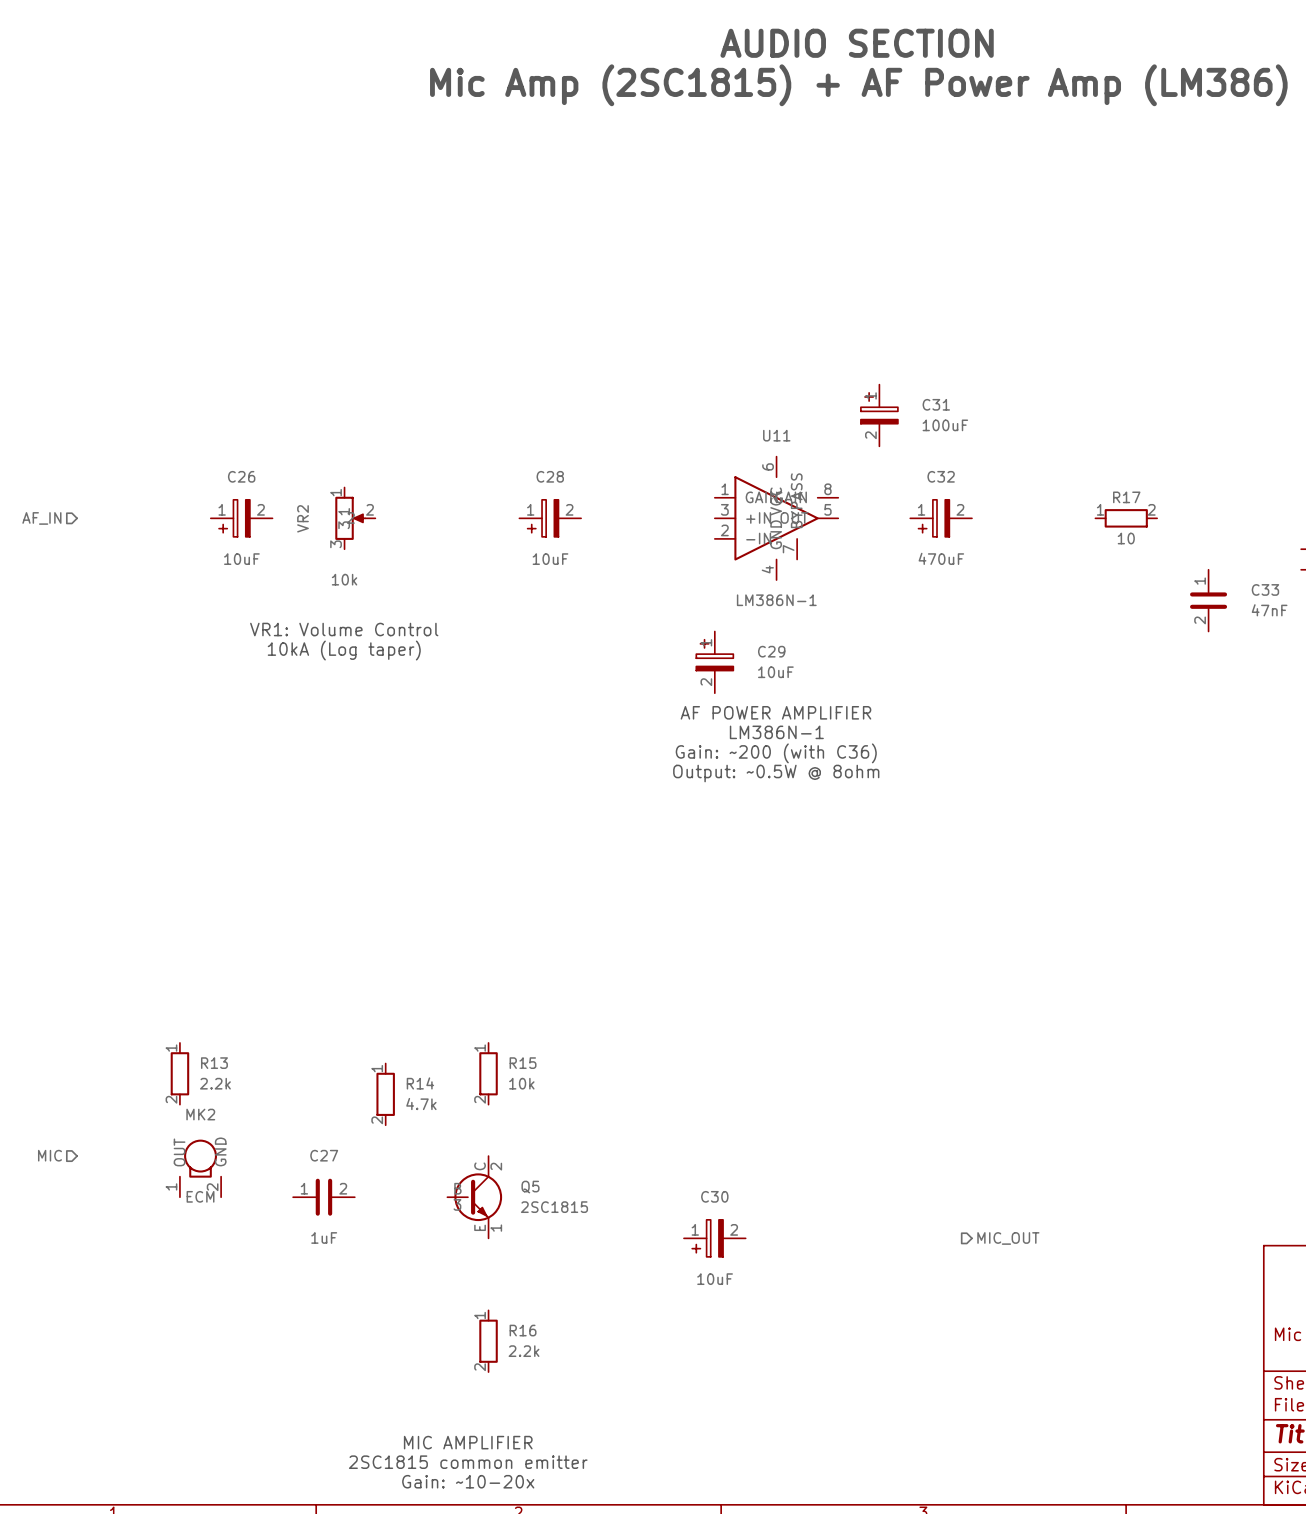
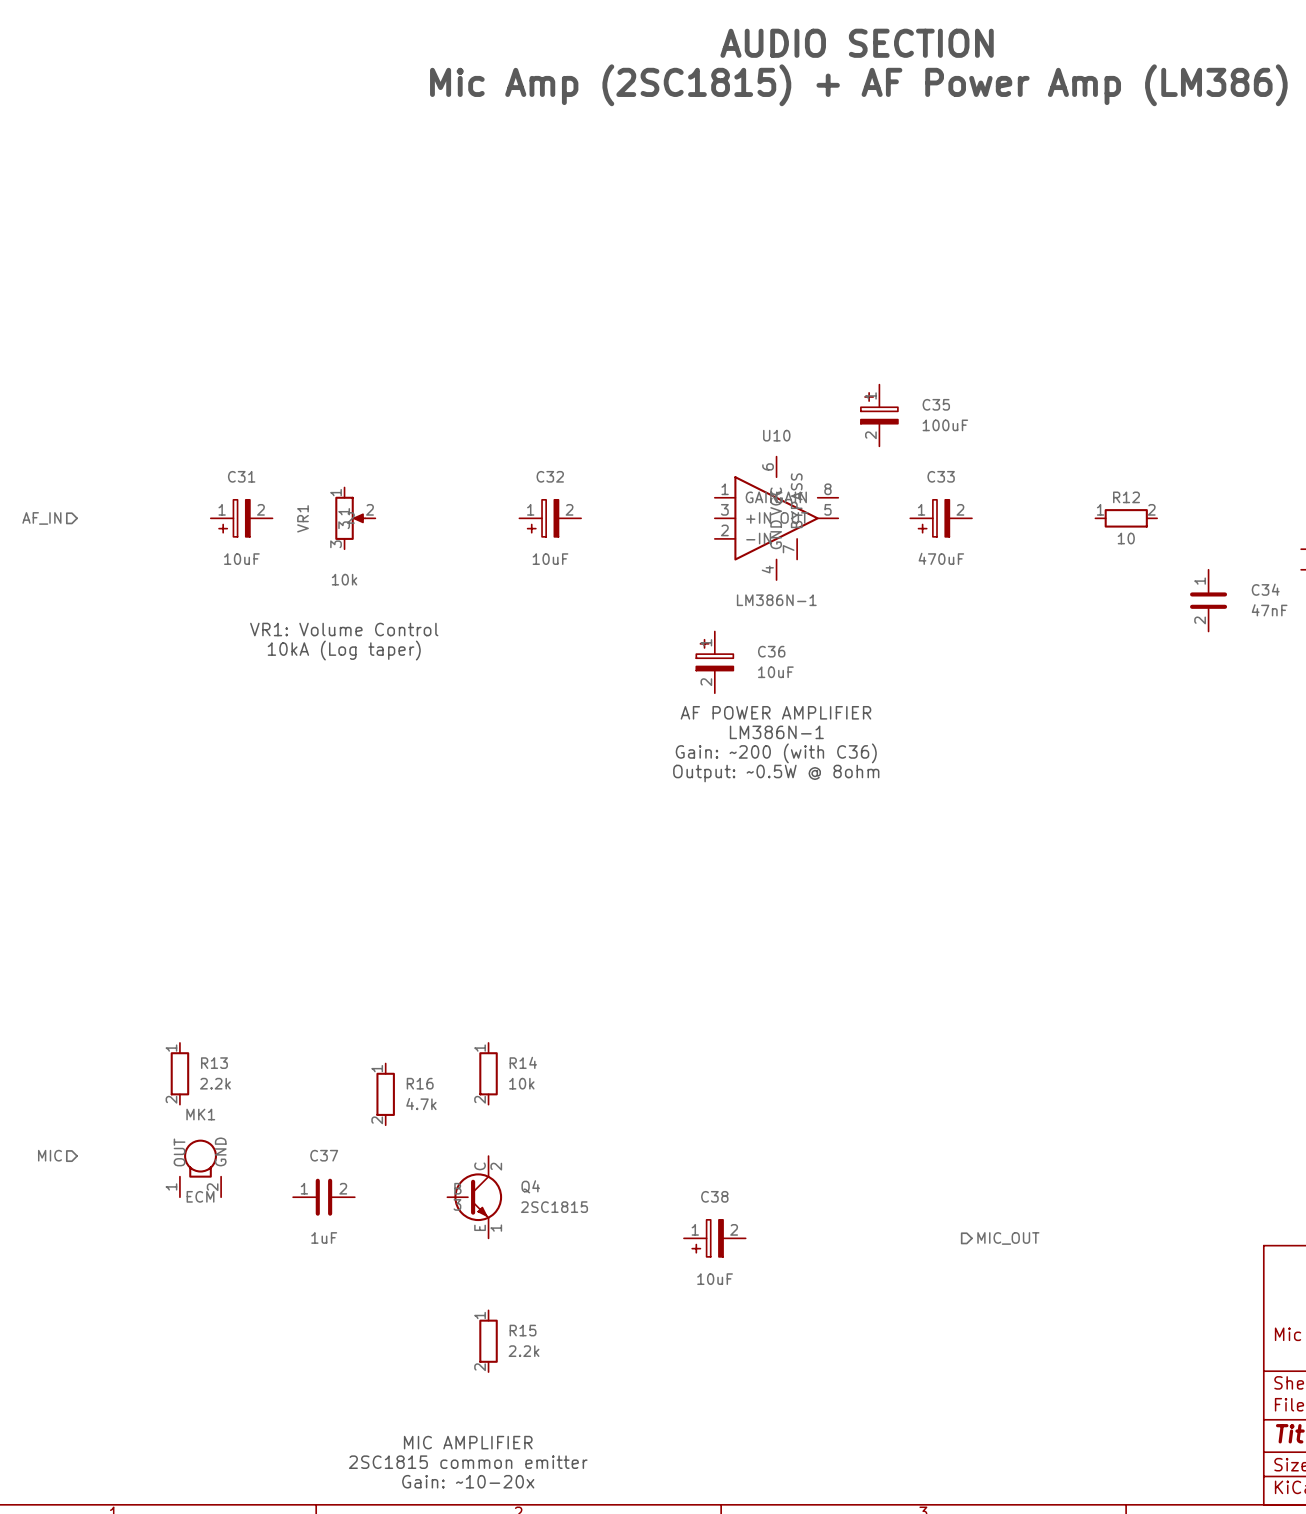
C31 name: C31 (936, 404) -> C35 (936, 404)
U11 name: U11 (776, 435) -> U10 (776, 435)
C26 name: C26 (241, 476) -> C31 (241, 476)
C28 name: C28 (550, 476) -> C32 (550, 476)
C32 name: C32 (941, 476) -> C33 (941, 476)
R17 name: R17 (1126, 497) -> R12 (1126, 497)
VR2 name: VR2 (303, 518) -> VR1 (303, 518)
C33 name: C33 (1265, 589) -> C34 (1265, 589)
C29 name: C29 (771, 651) -> C36 (771, 651)
R15 name: R15 (523, 1063) -> R14 (523, 1062)
R14 name: R14 (420, 1083) -> R16 (420, 1083)
MK2 name: MK2 (200, 1114) -> MK1 (200, 1114)
C27 name: C27 (324, 1155) -> C37 (324, 1155)
Q5 name: Q5 (530, 1187) -> Q4 (530, 1186)
C30 name: C30 (714, 1196) -> C38 (714, 1196)
R16 name: R16 (523, 1330) -> R15 (523, 1330)

